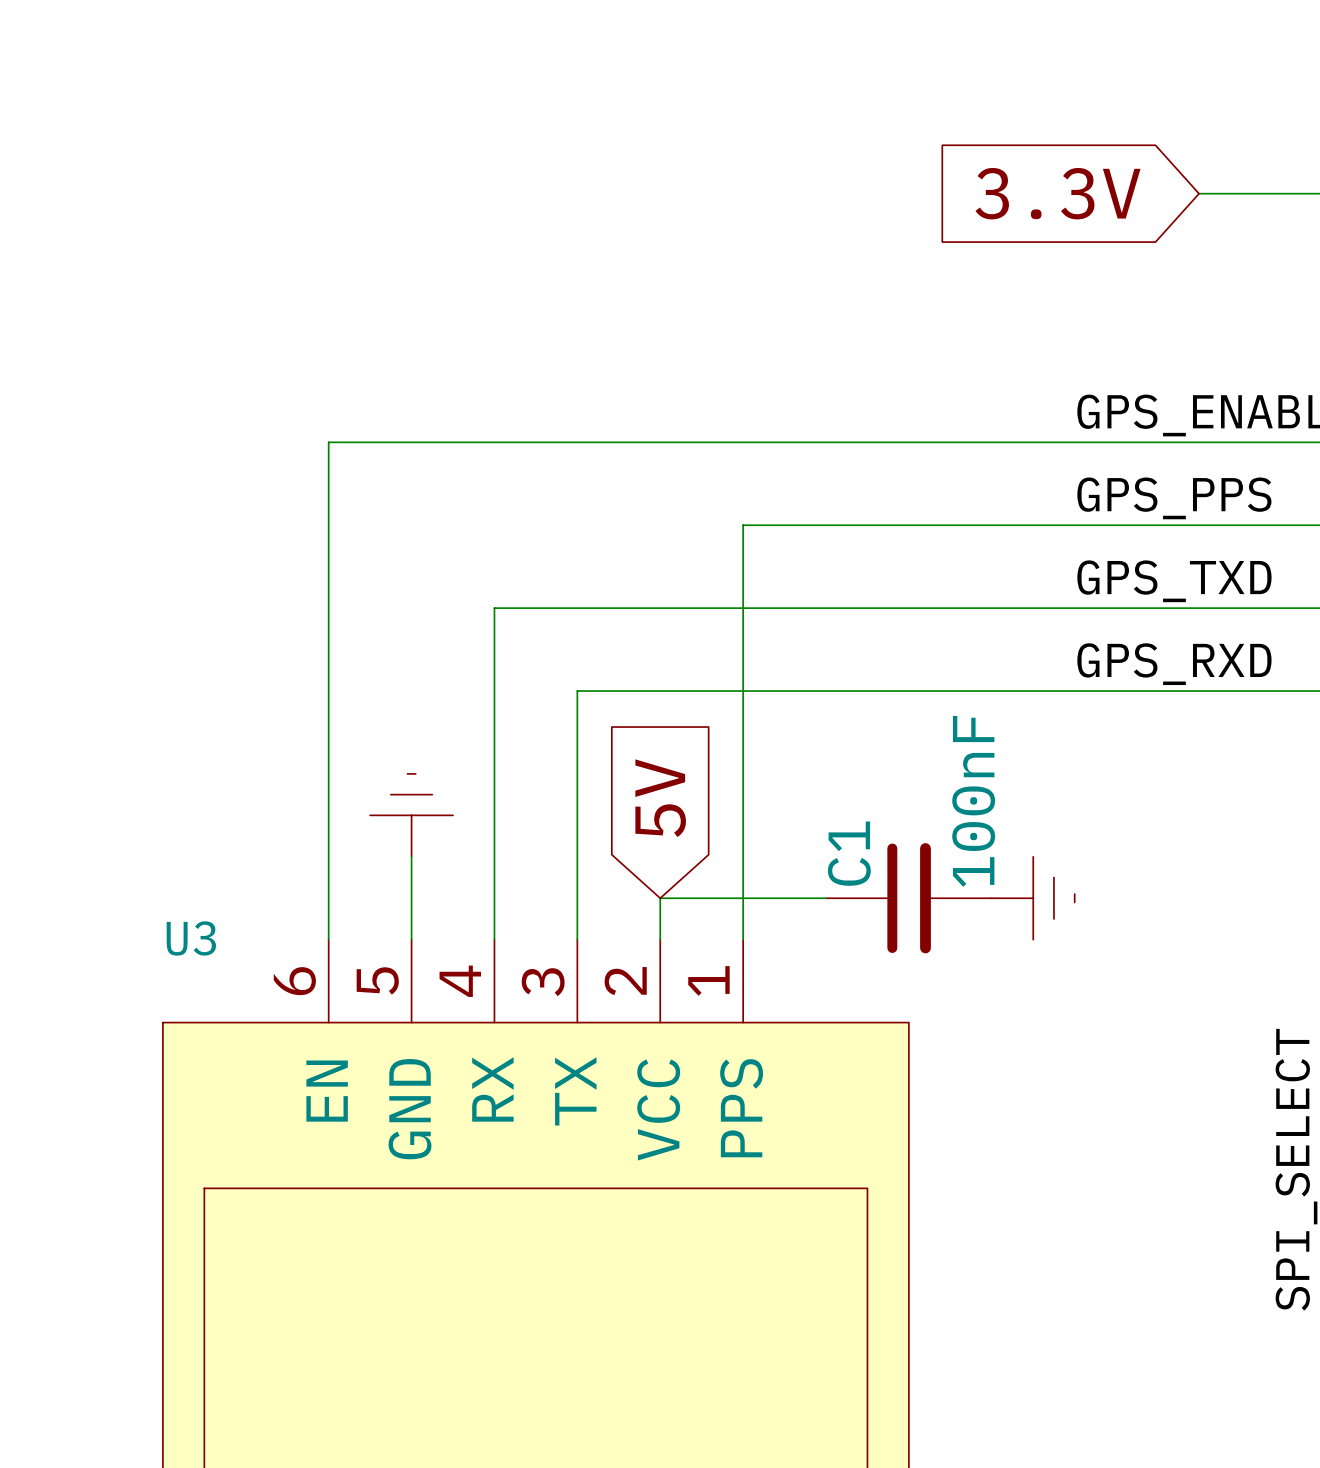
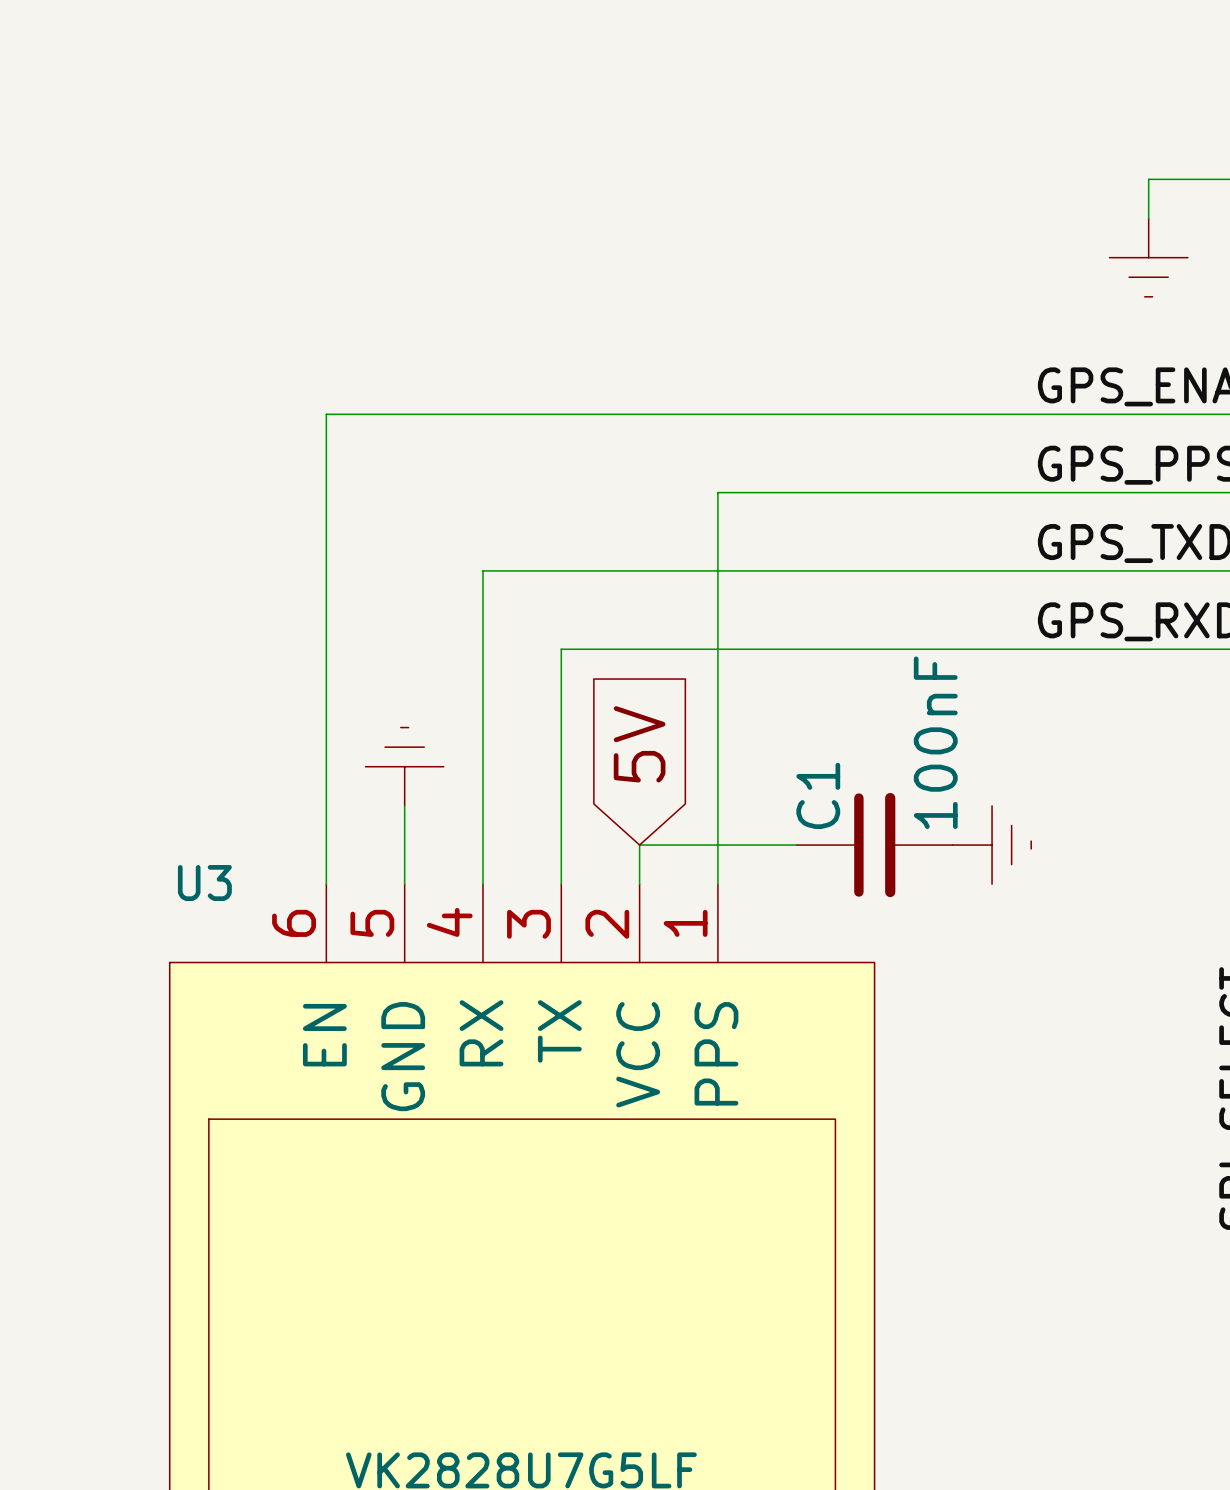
global label: 3.3V (1058, 193) -> none
wire: none -> (1148, 179) (1148, 218)
power symbol: none -> (1148, 257)

